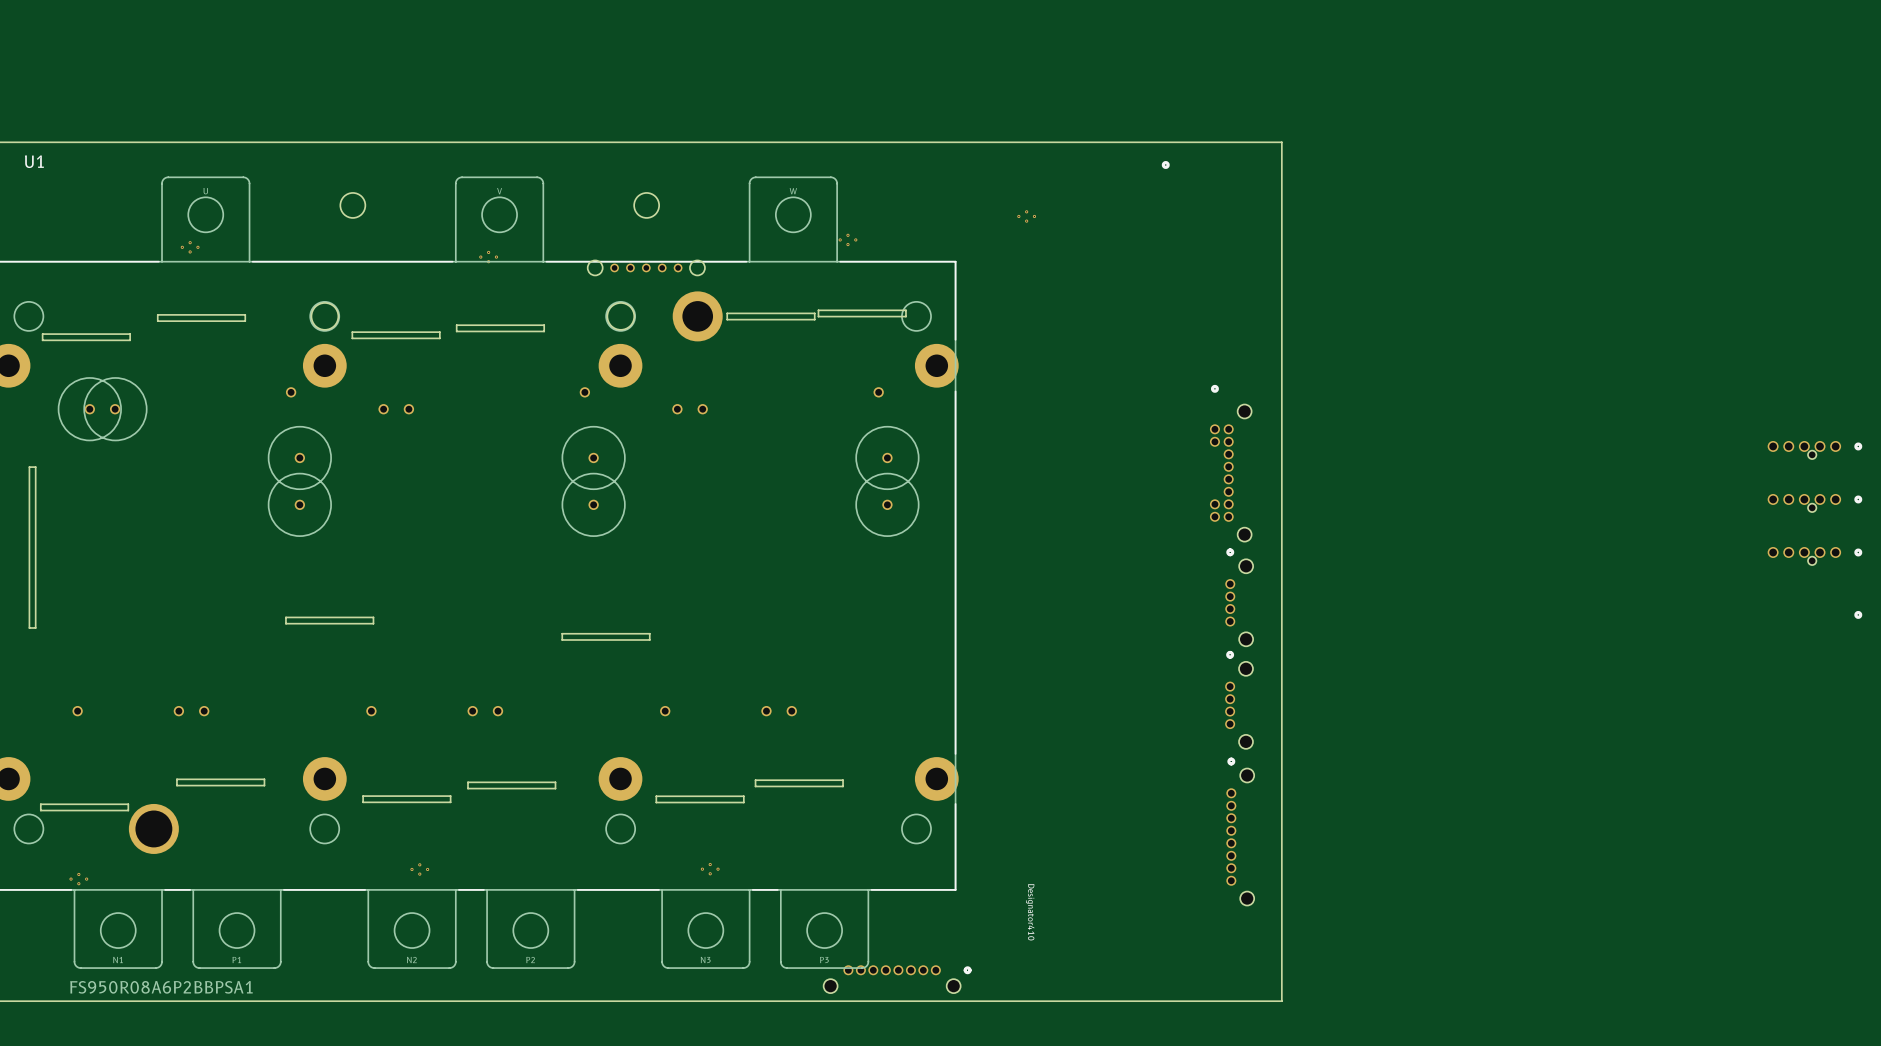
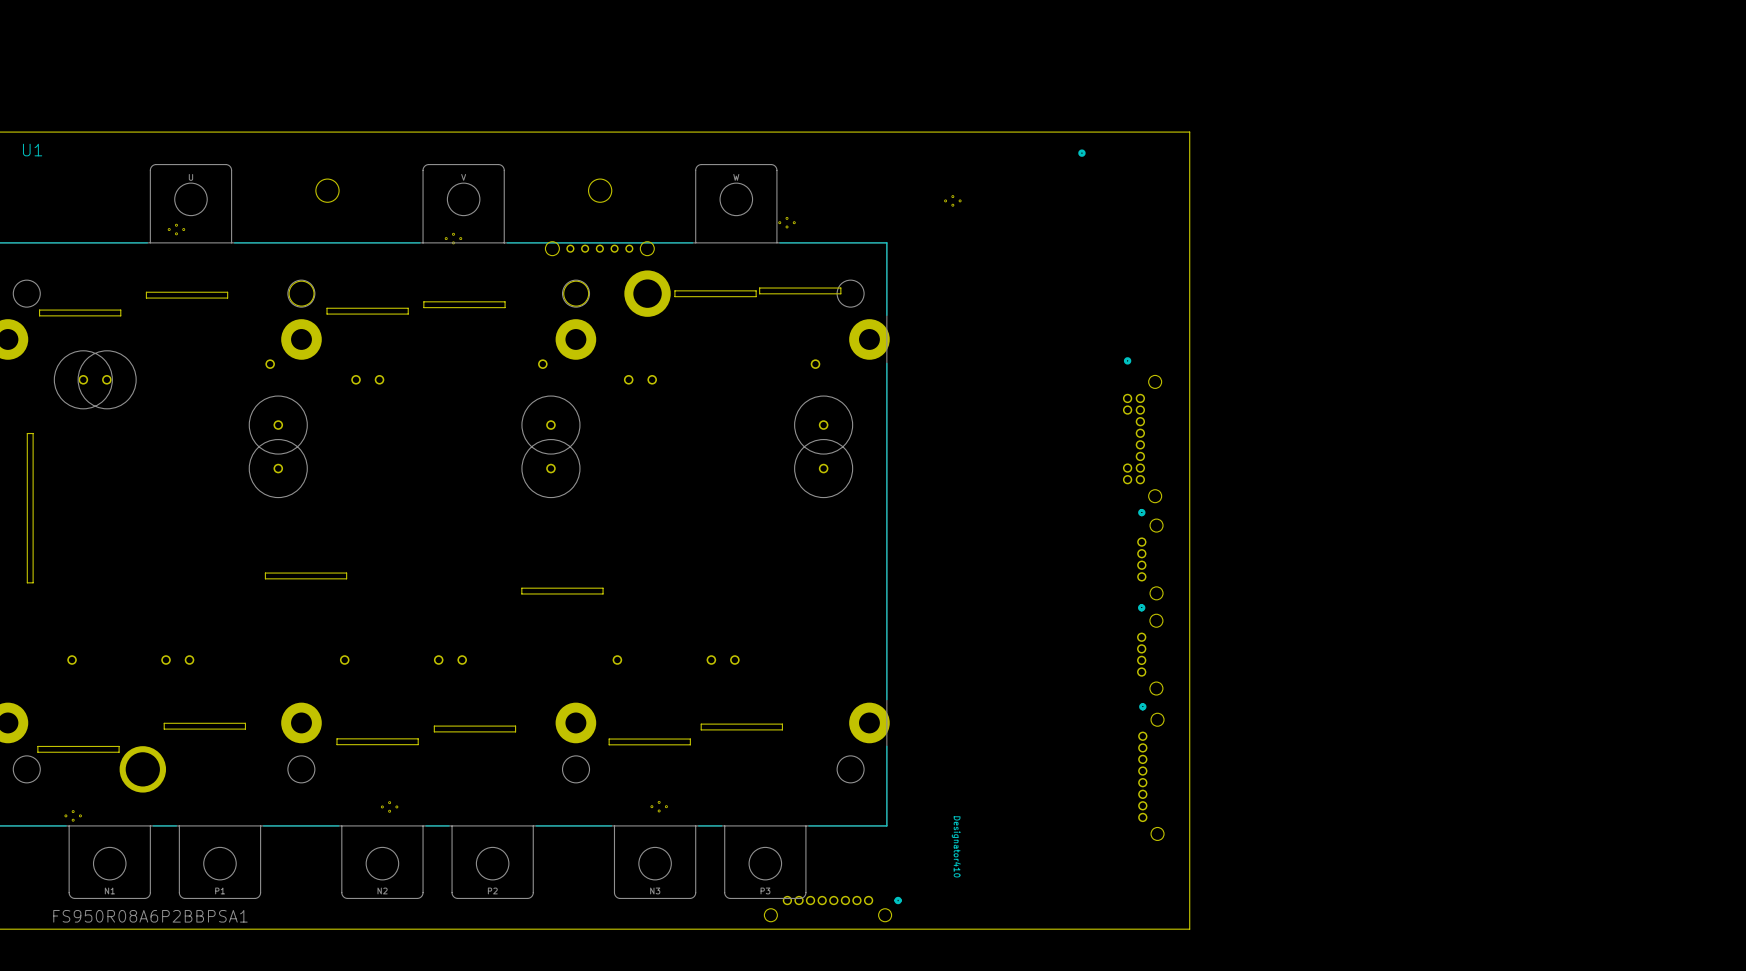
part: (1814, 450) -> none
part: (1814, 503) -> none
part: (1814, 556) -> none
part: (1858, 614) -> none

